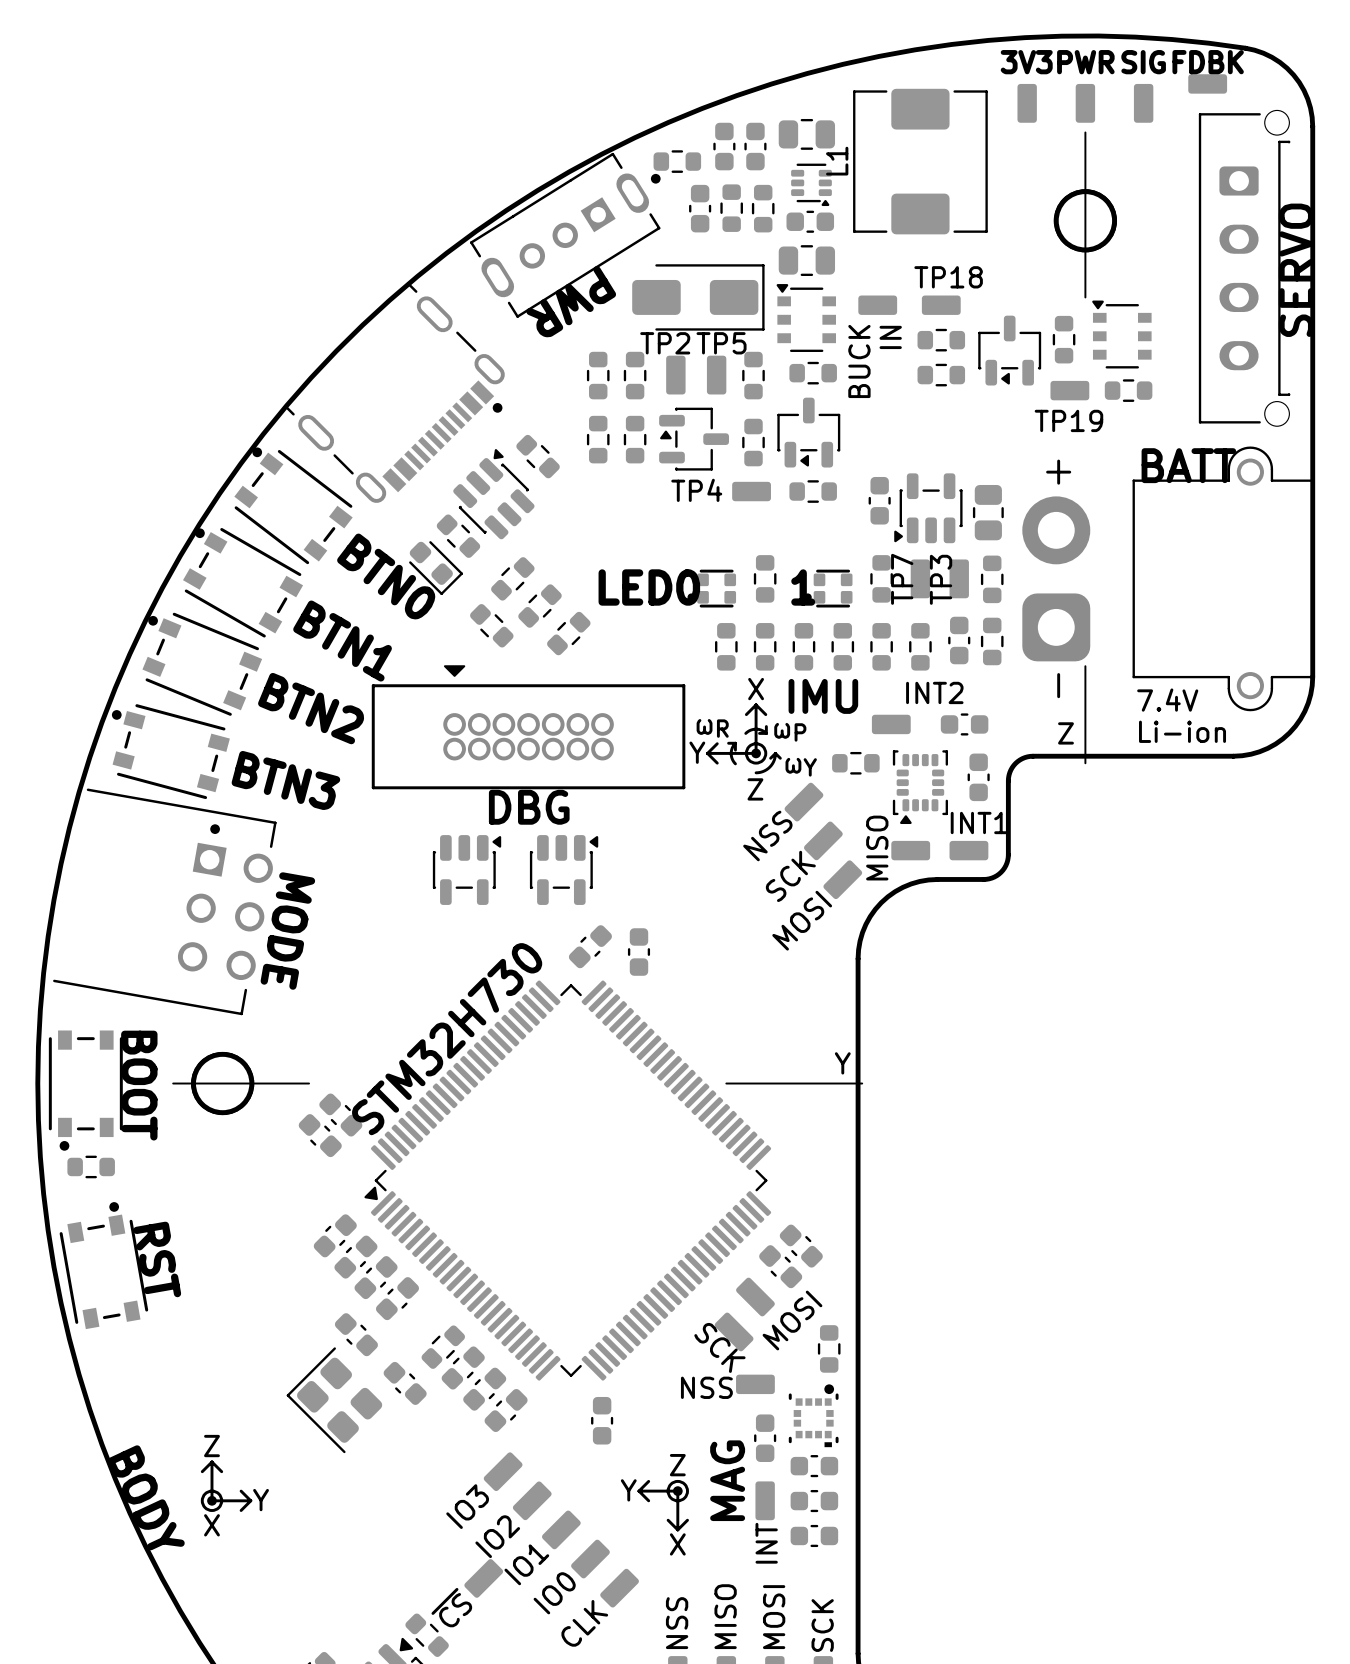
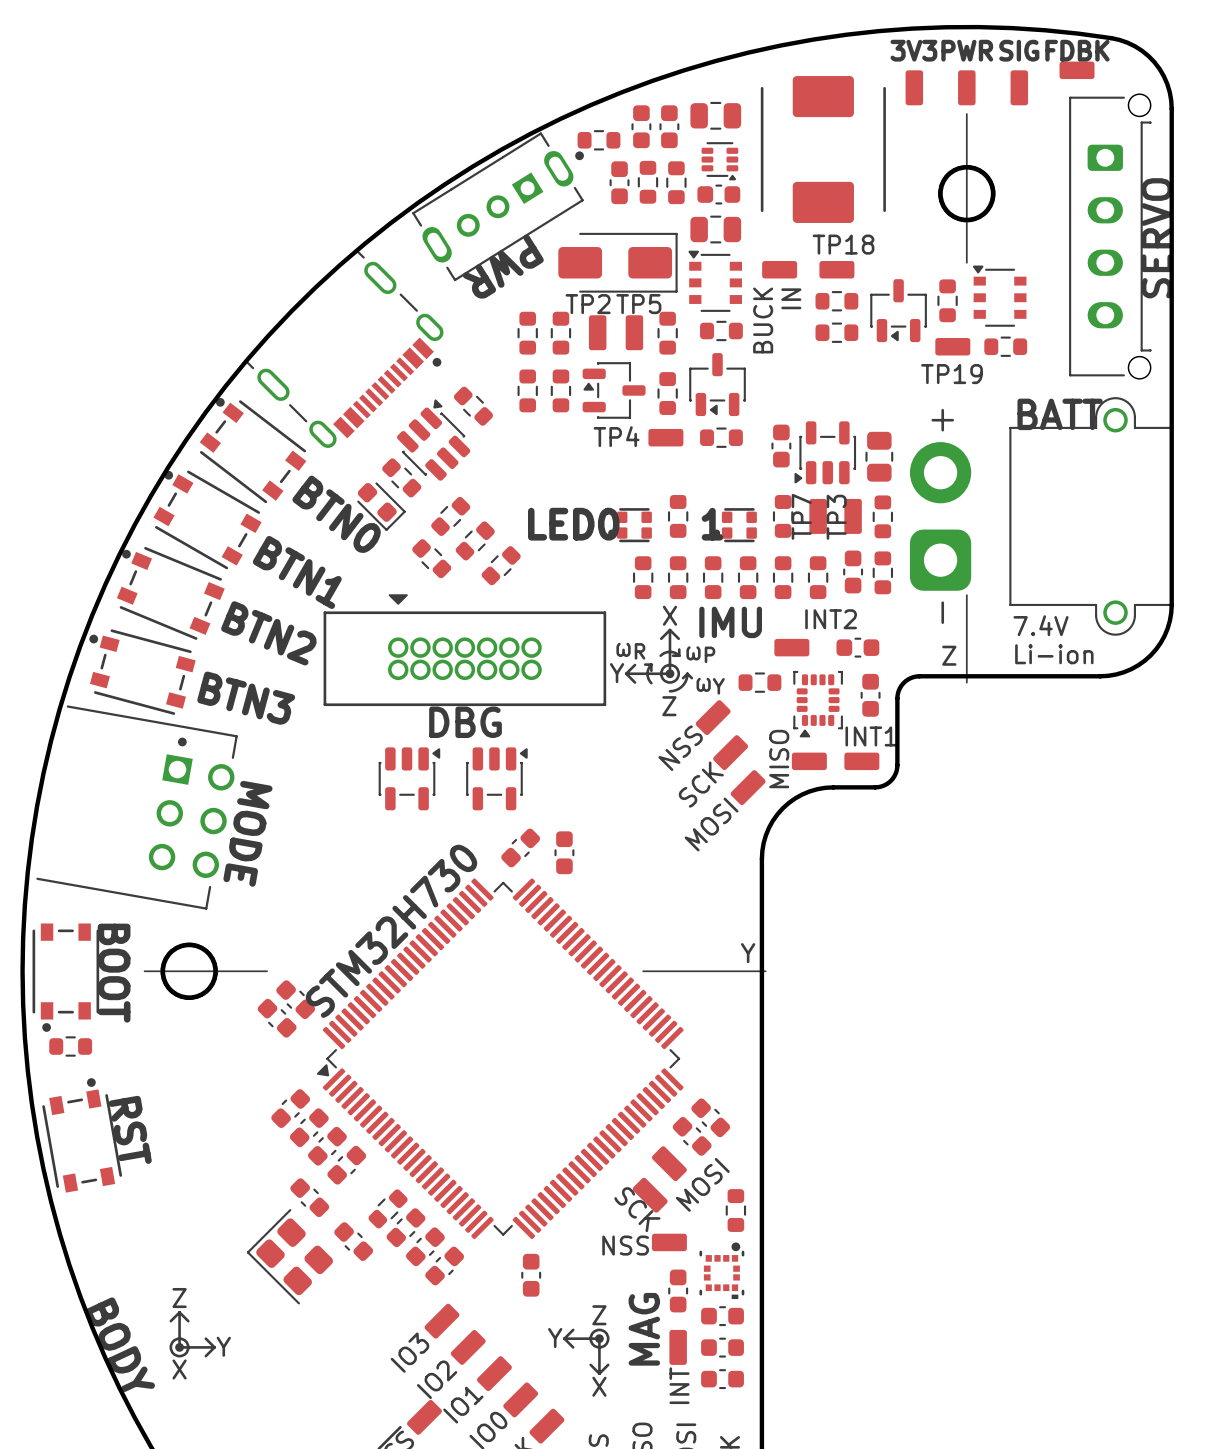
L1: (920, 161) -> none
part: none -> (823, 149)

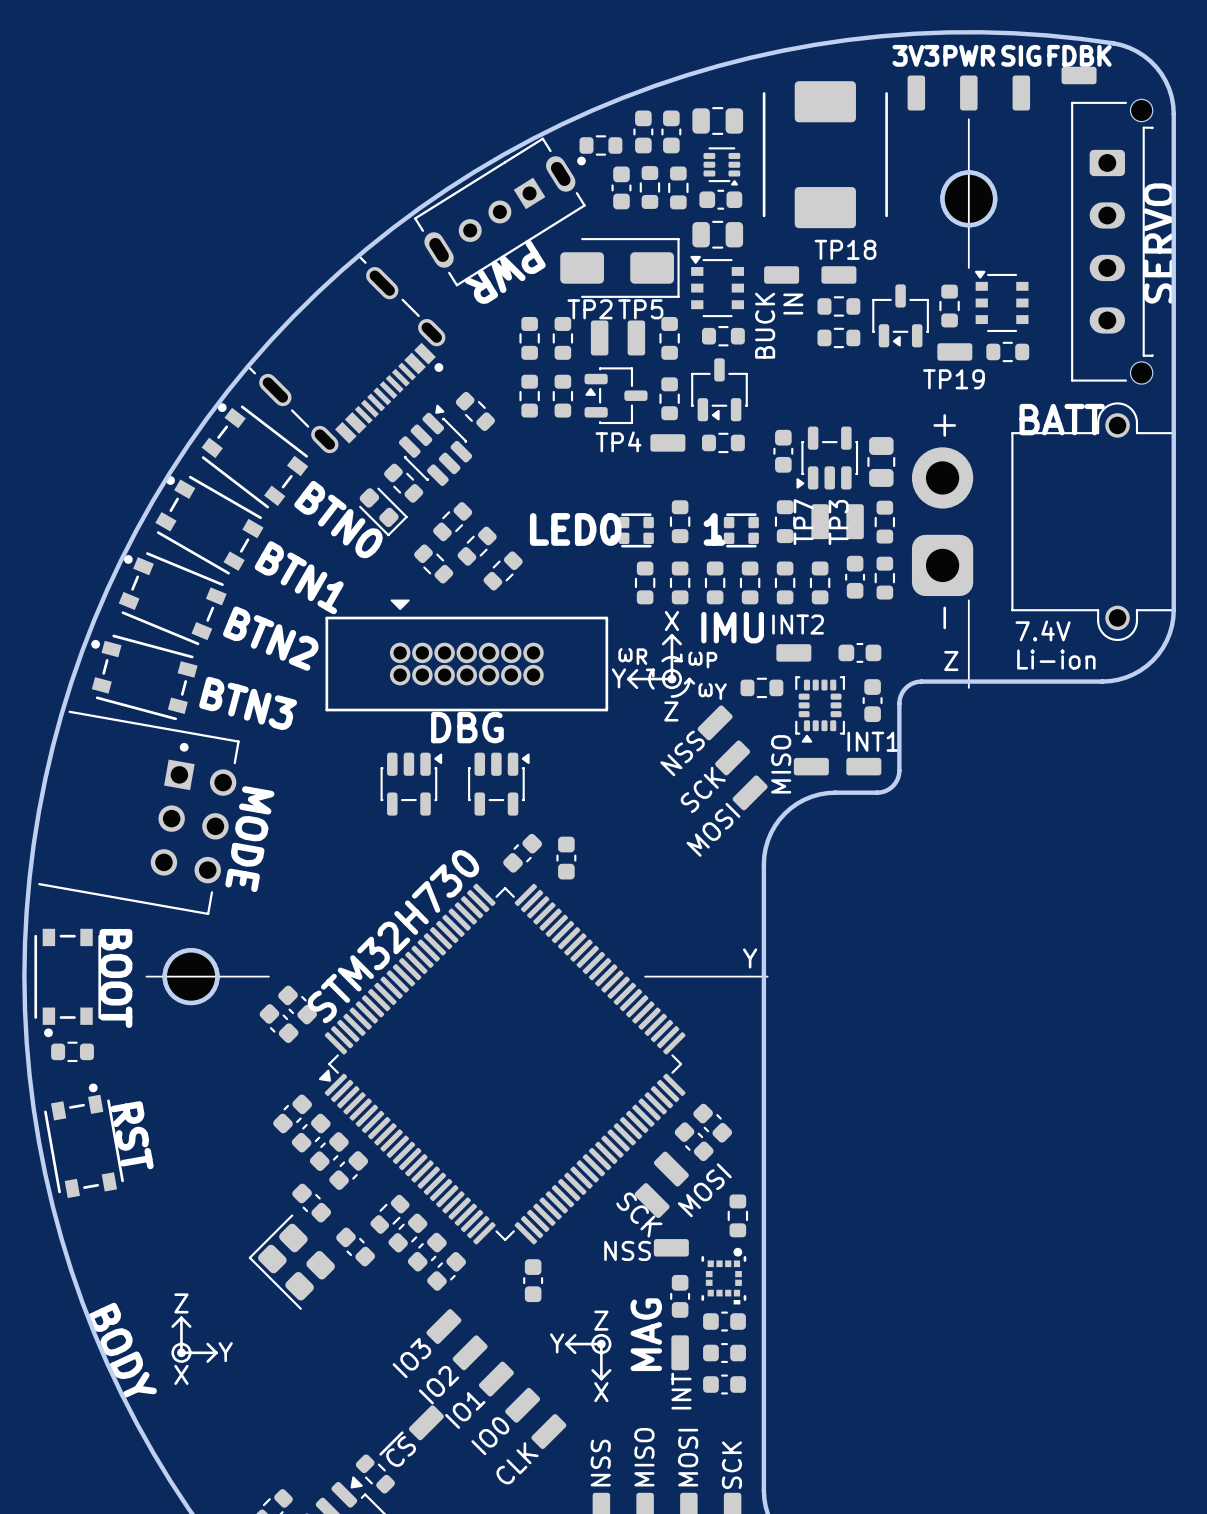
text position: INT2 (831, 619) -> INT2 (798, 624)

